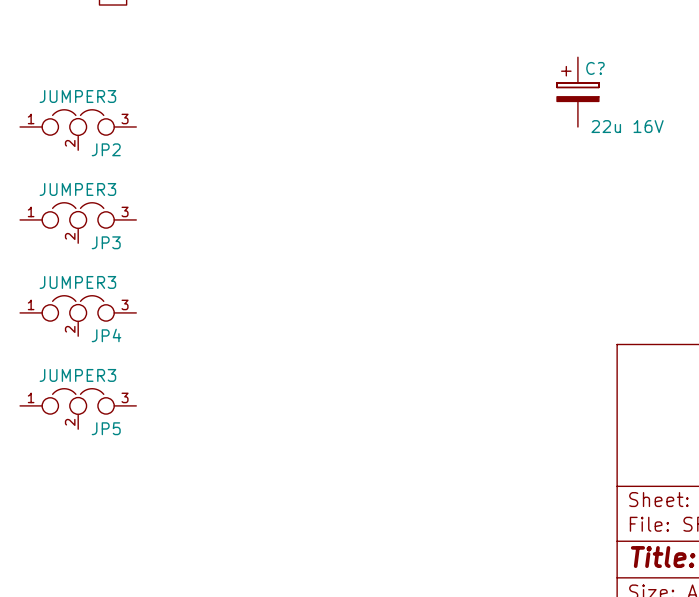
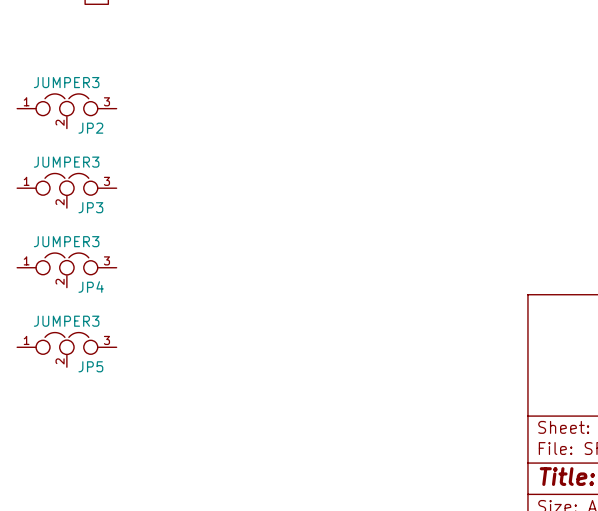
C?: 22u 16V (577, 92) -> none

